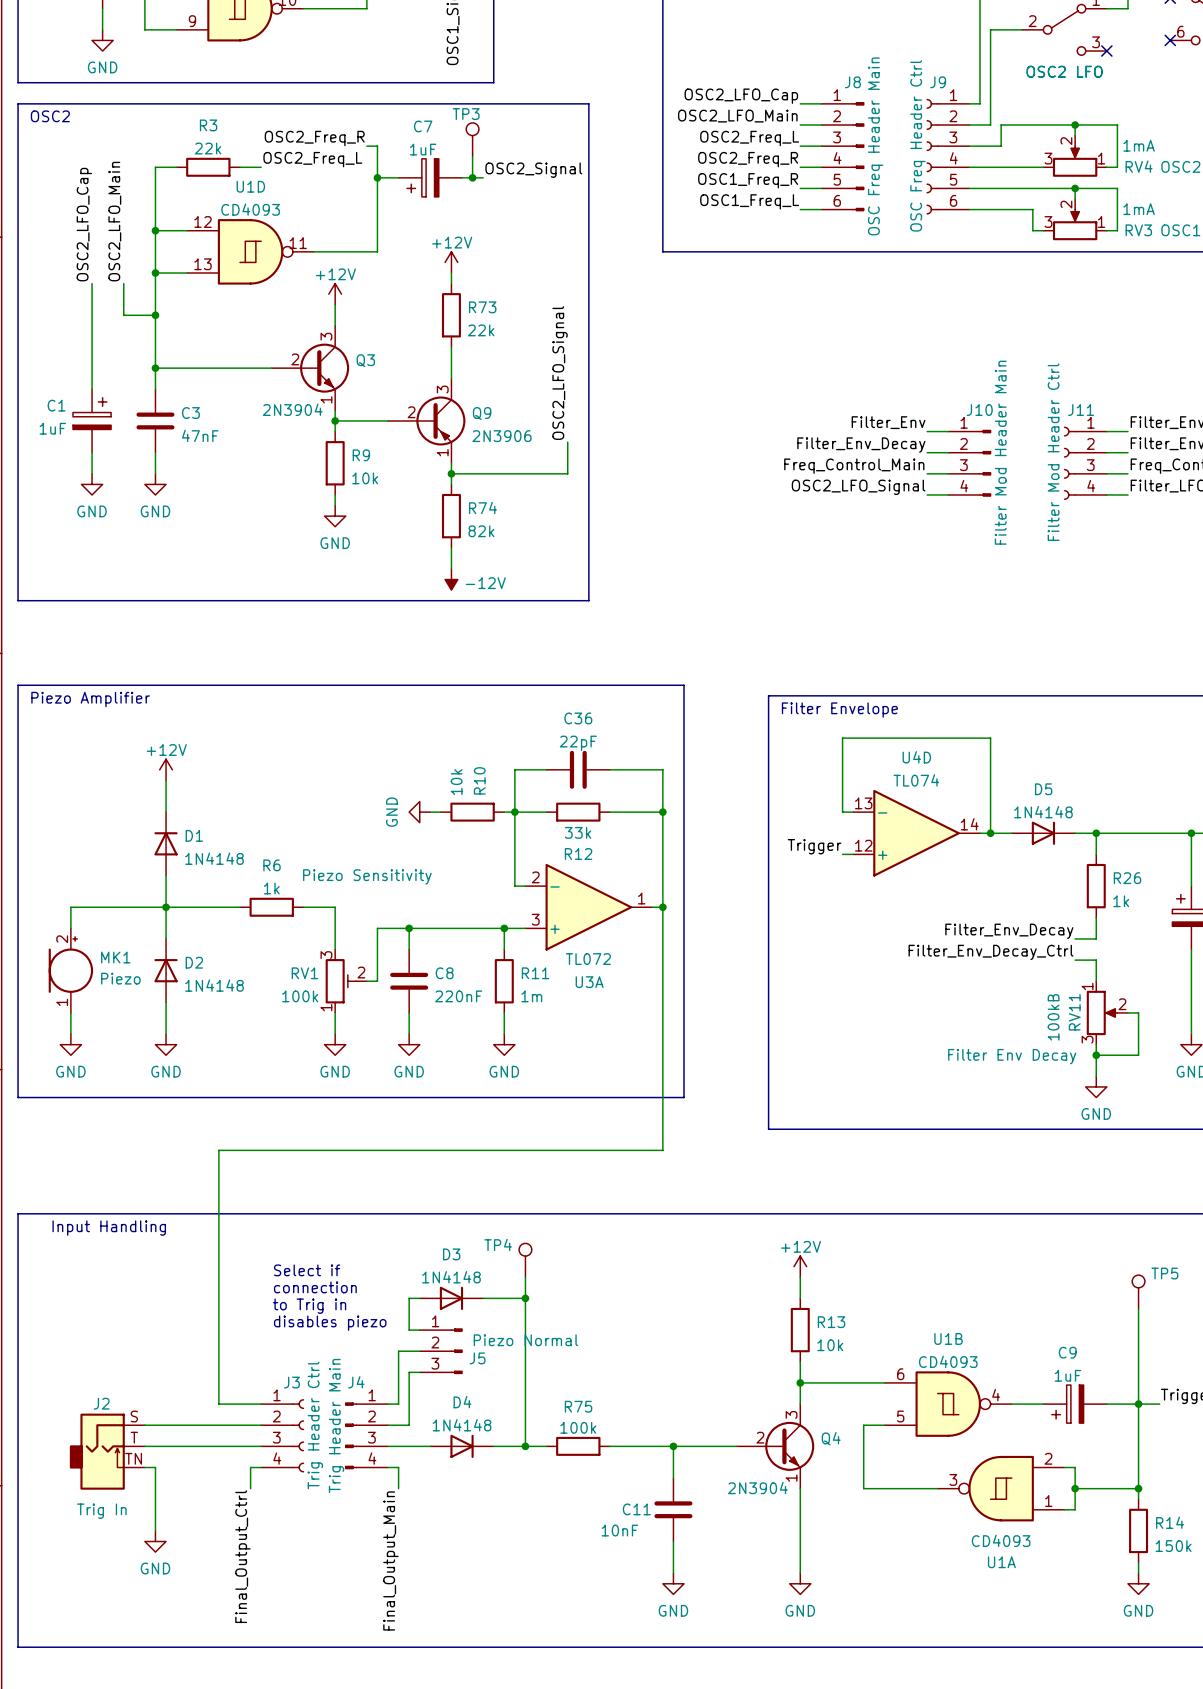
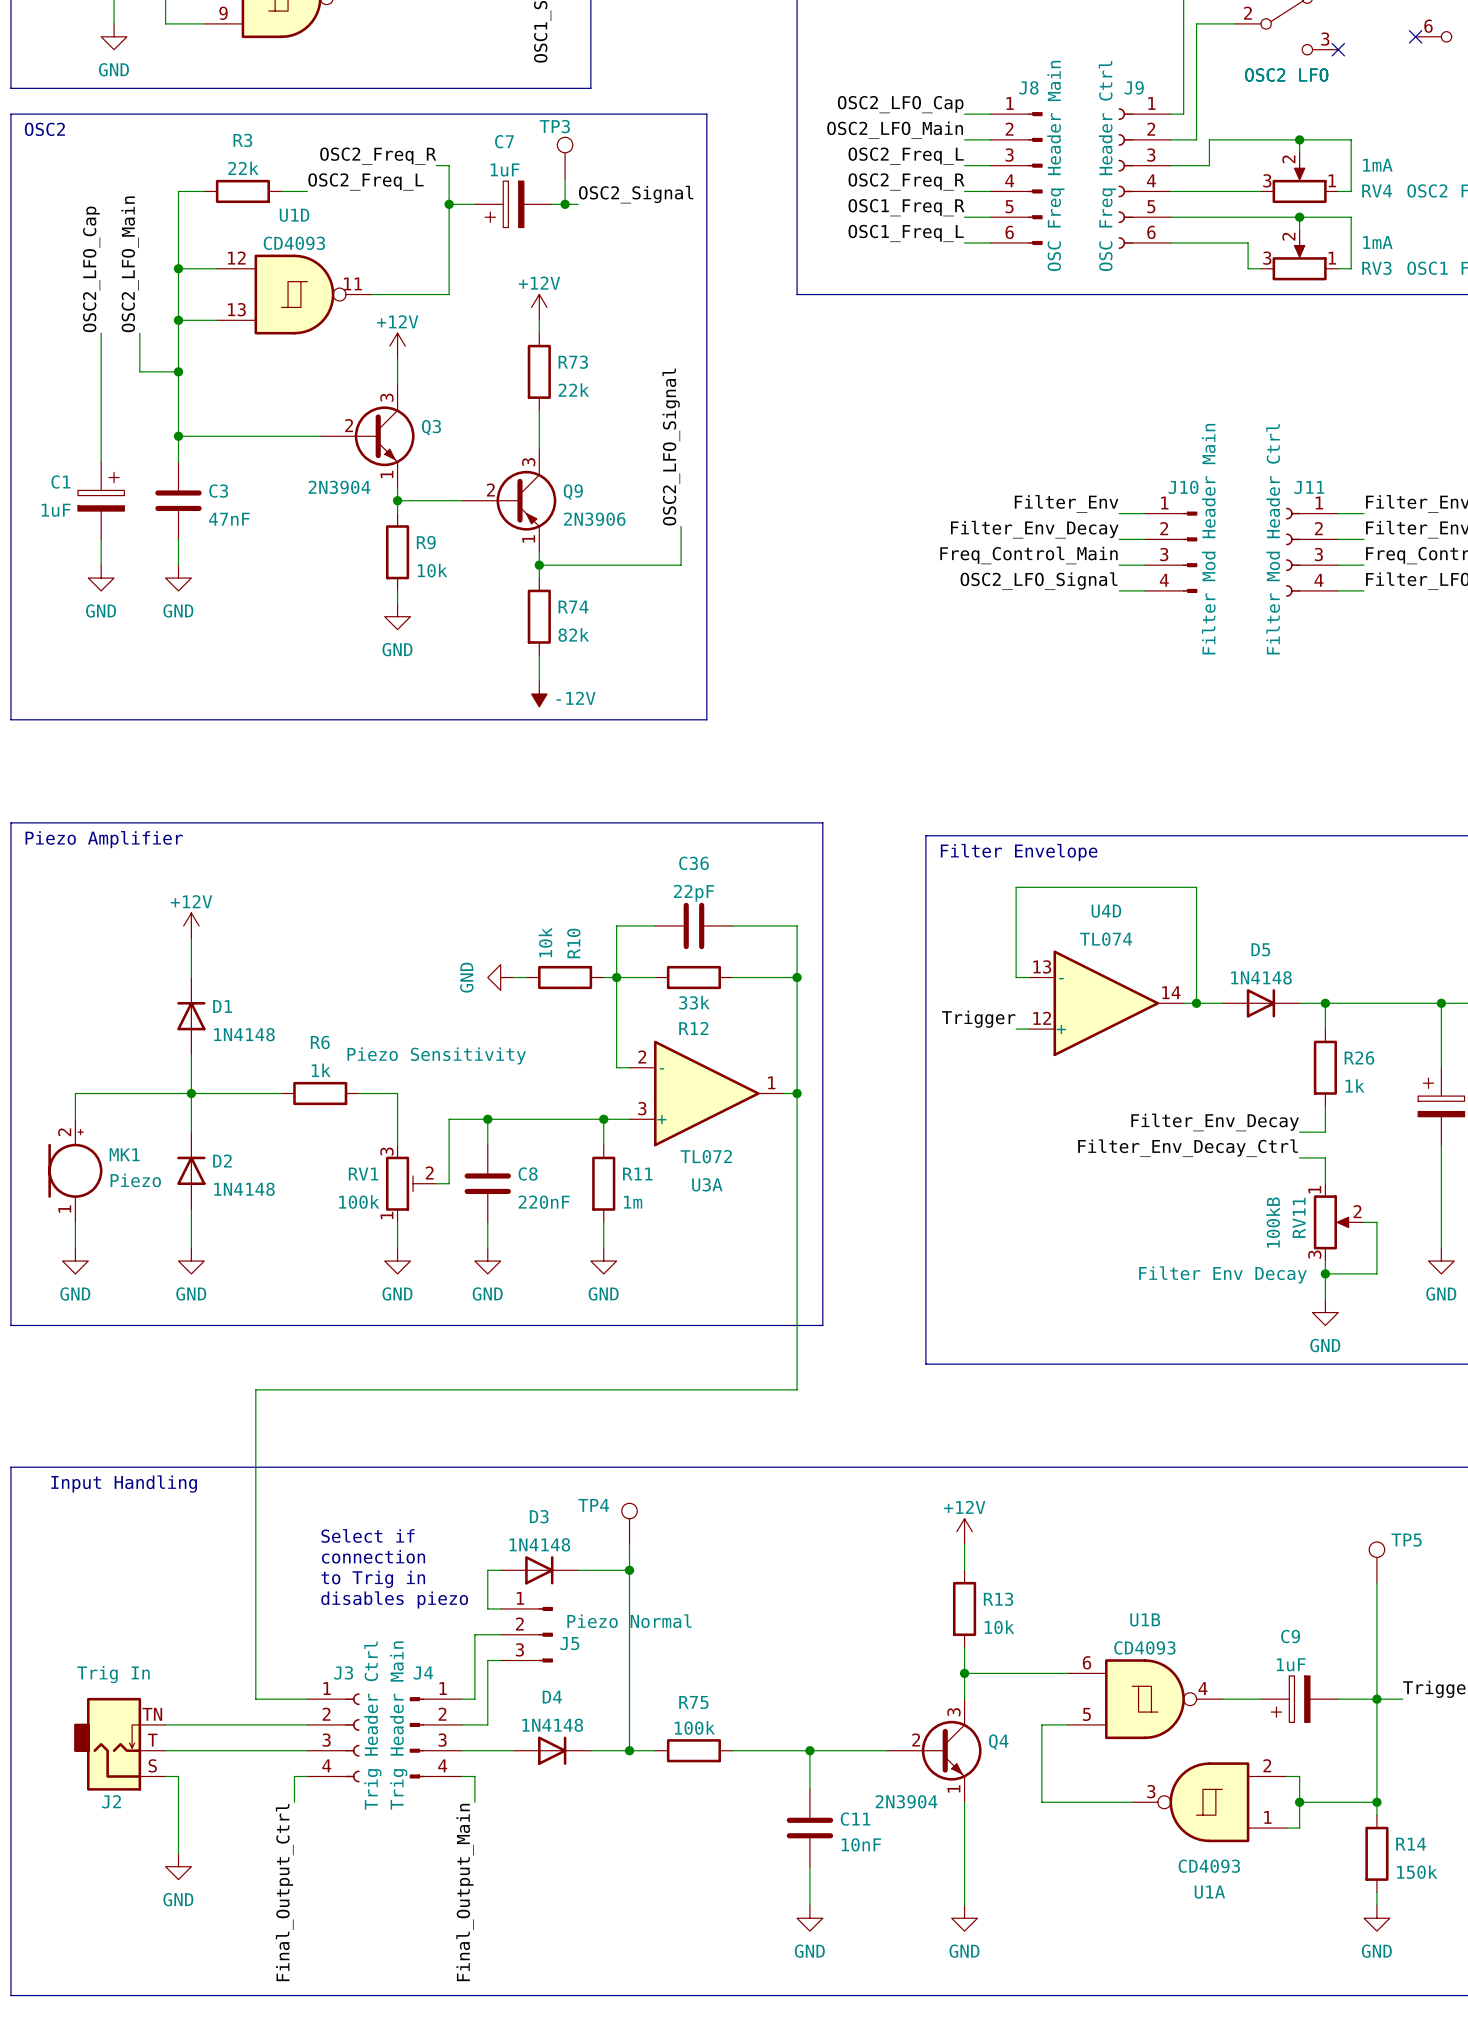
J2 flip: as is (97, 1451) -> up-down (107, 1744)
C11 name position: C11 (636, 1509) -> C11 (855, 1819)
C11 value position: 10nF (619, 1530) -> 10nF (861, 1844)

